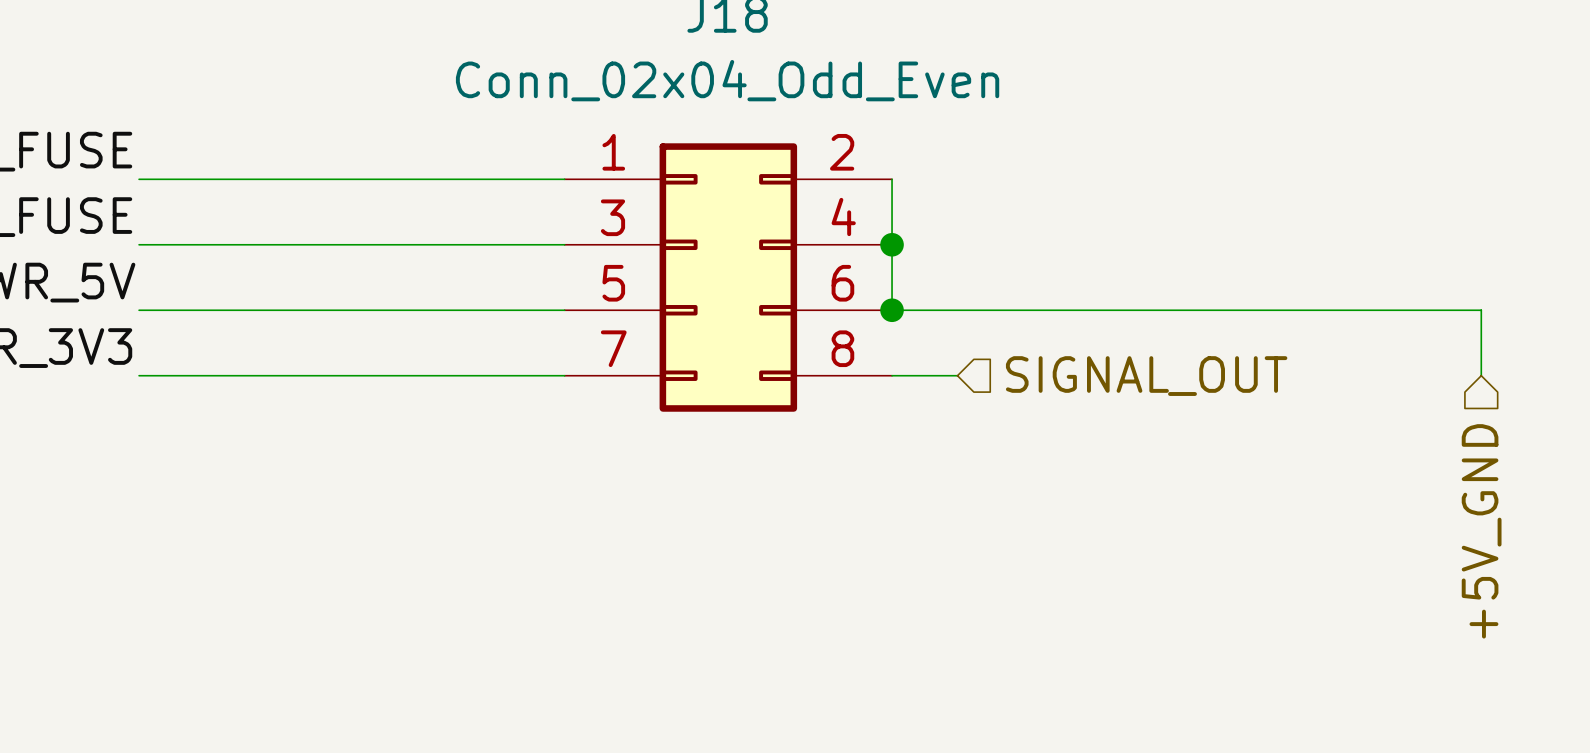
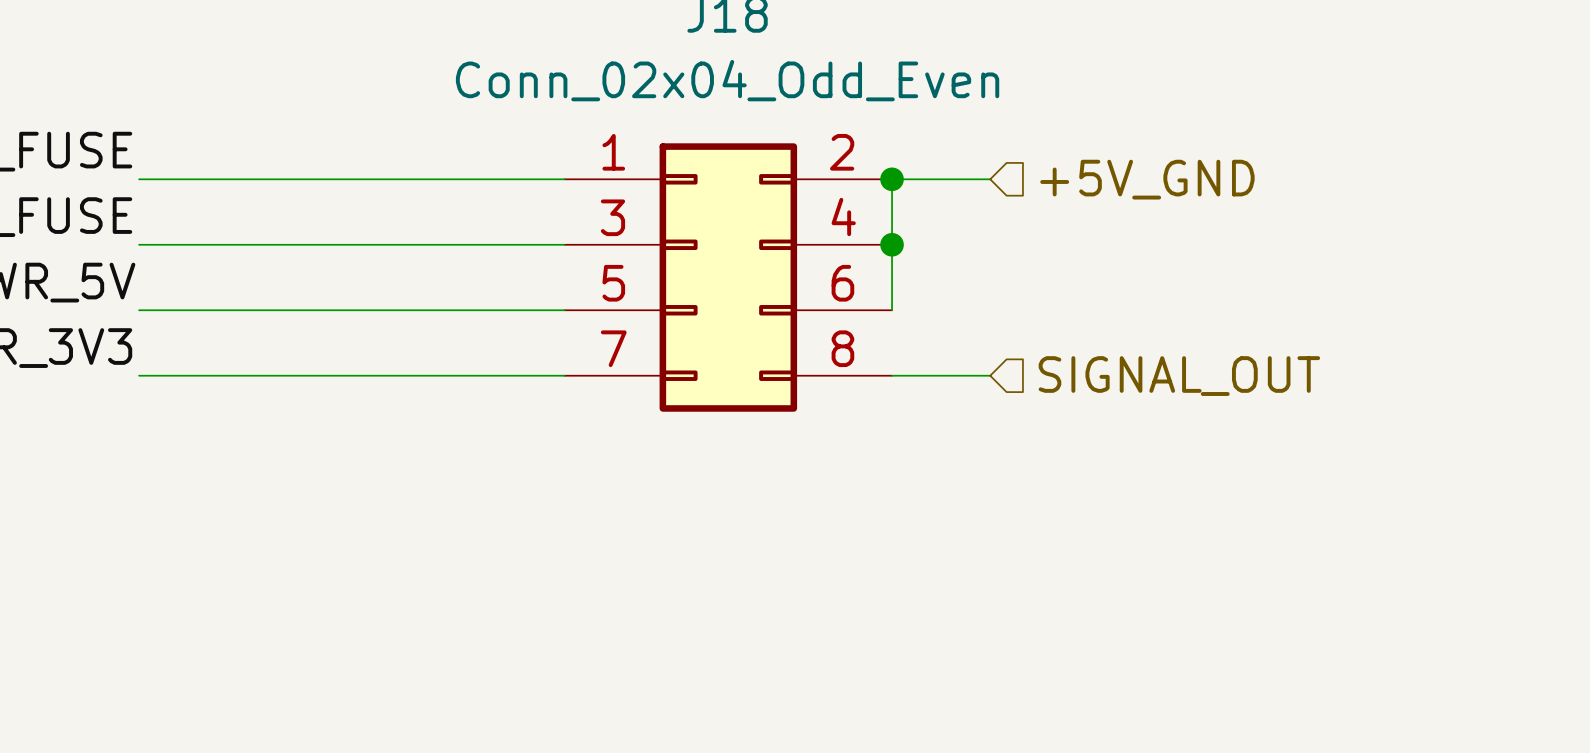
wire: none -> (892, 179) (990, 179)
wire: (892, 310) (1481, 310) (1481, 375) -> none
junction position: (892, 310) -> (892, 179)
wire: none -> (957, 375) (990, 375)
hierarchical label position: SIGNAL_OUT (1146, 376) -> SIGNAL_OUT (1179, 376)
hierarchical label rotation: 0° (1481, 531) -> 90° counterclockwise (1147, 179)
hierarchical label position: +5V_GND (1481, 531) -> +5V_GND (1147, 179)

